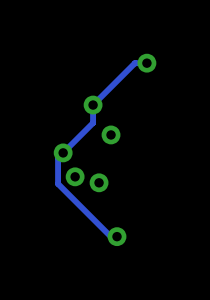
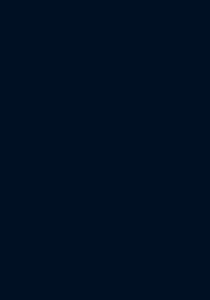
track: (146, 63) (134, 63) (93, 105) (93, 122) (58, 158) (58, 183) (110, 236) (117, 236) -> none
via: (146, 63) -> none
via: (93, 105) -> none
via: (111, 134) -> none
via: (63, 152) -> none
via: (75, 176) -> none
via: (99, 182) -> none
via: (117, 236) -> none

